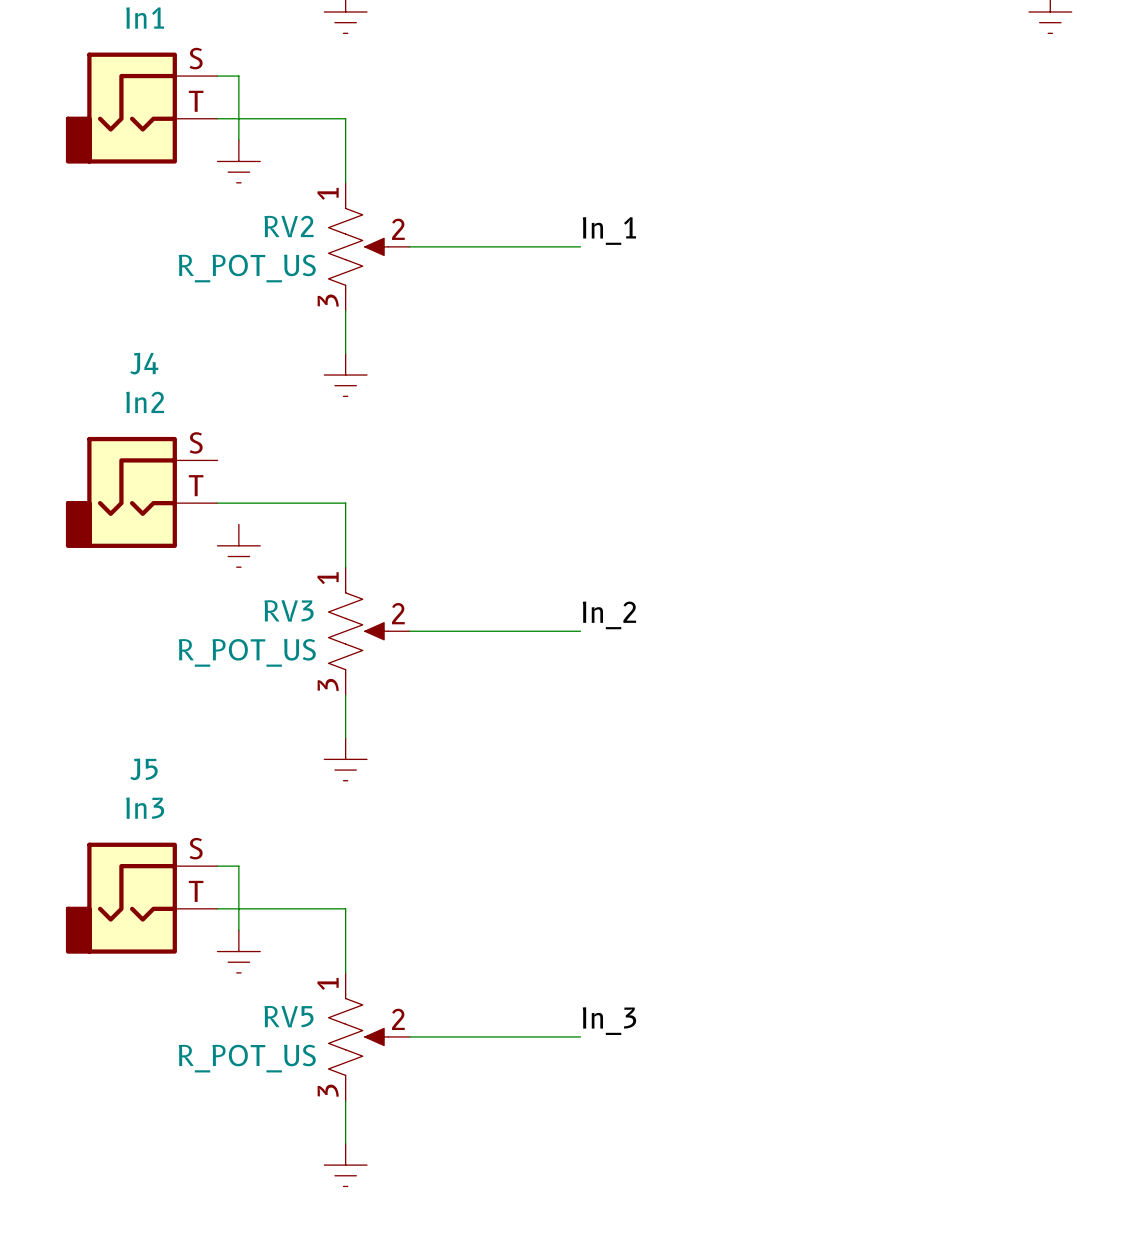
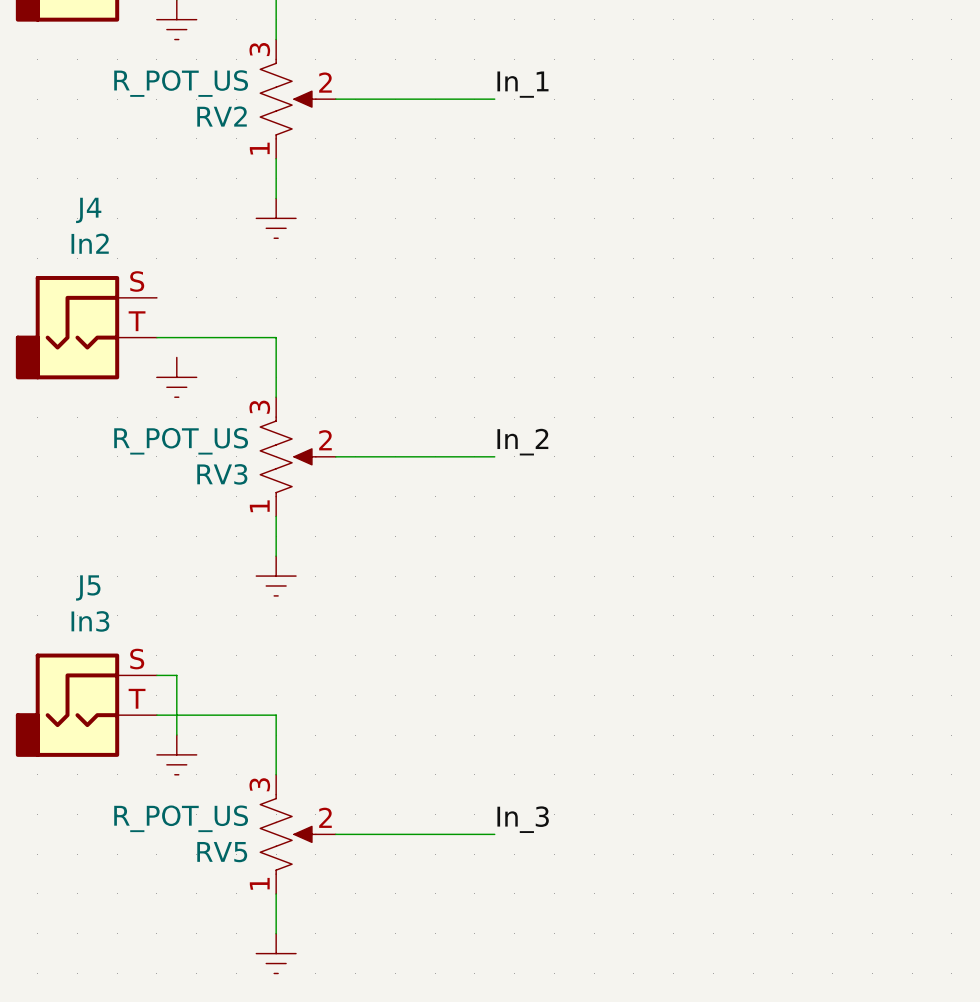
RV2 flip: as is (358, 246) -> up-down (288, 99)
RV3 flip: as is (358, 631) -> up-down (288, 456)
RV5 flip: as is (358, 1036) -> up-down (288, 834)

